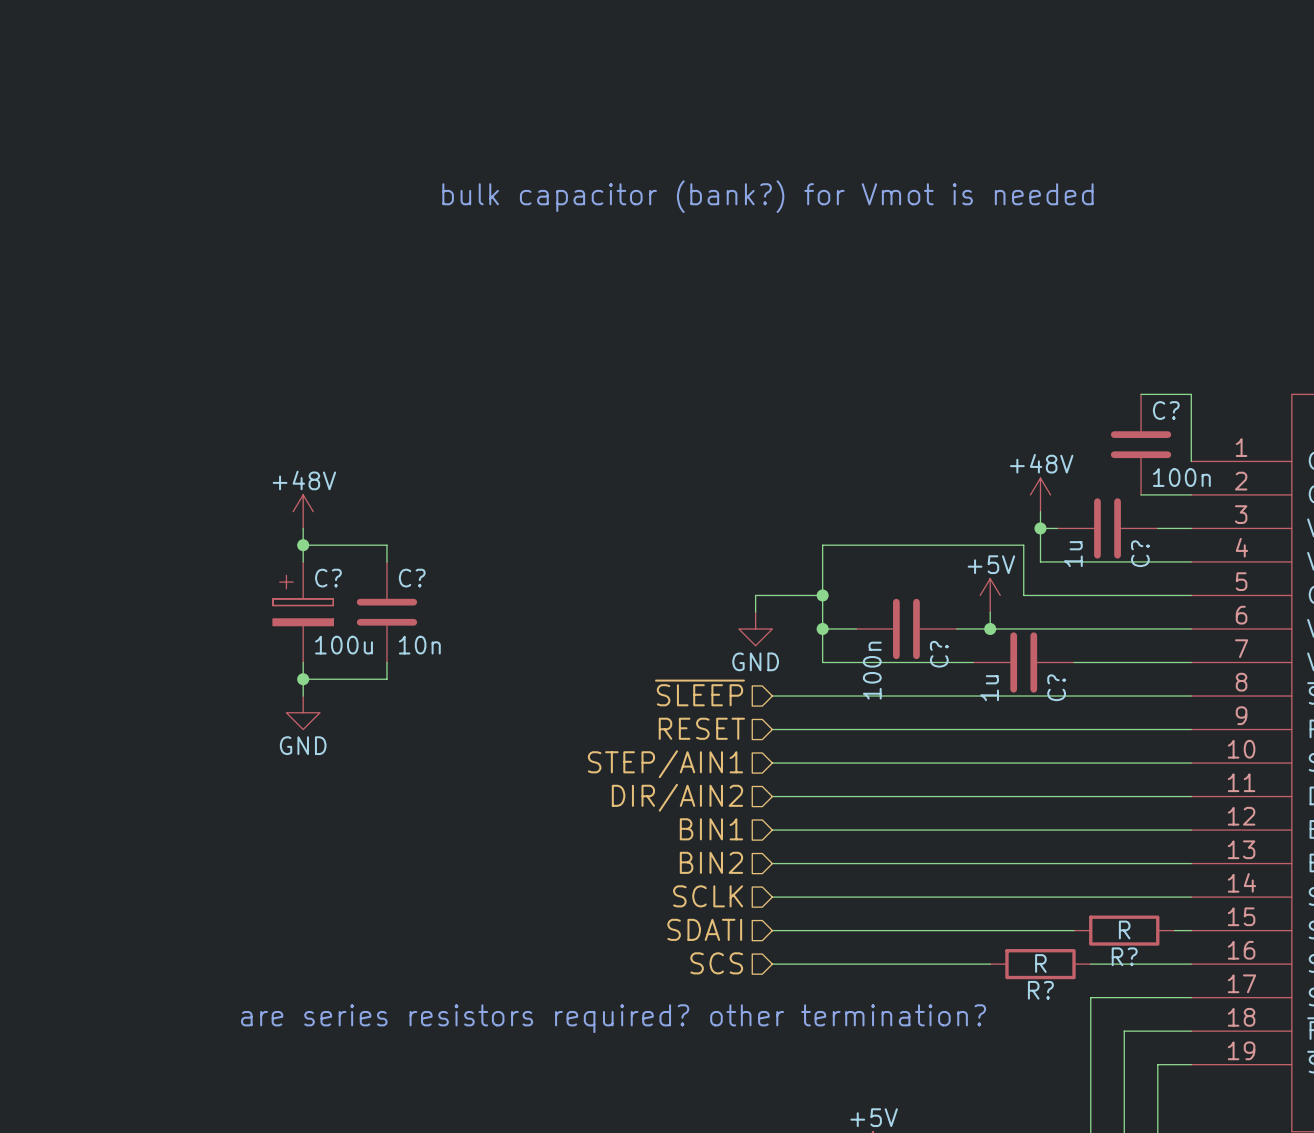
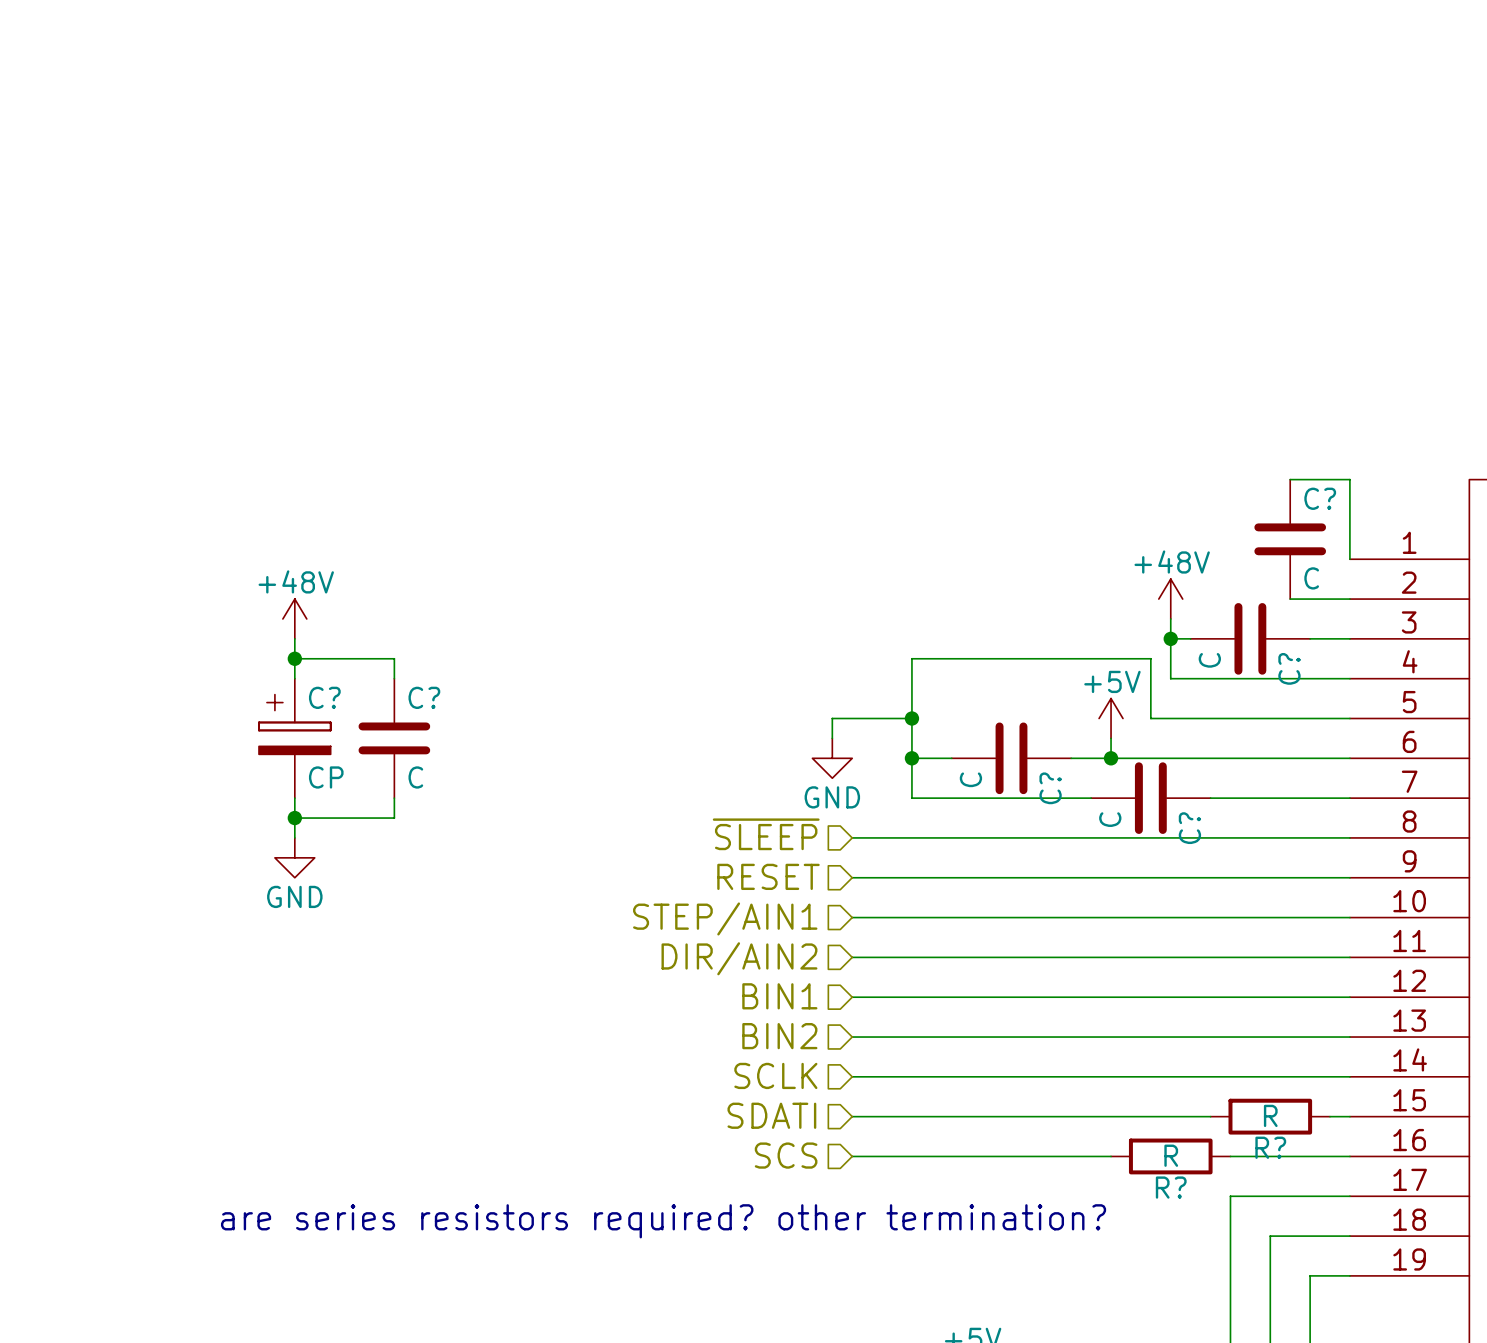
text: bulk capacitor (bank?) for Vmot is needed (767, 196) -> none
C? value: 100n (1181, 477) -> C (1311, 578)
C? value: 1u (1073, 554) -> C (1209, 660)
C? value: 100u (344, 645) -> CP (326, 777)
C? value: 10n (419, 645) -> C (415, 777)
C? value: 100n (872, 670) -> C (970, 779)
C? value: 1u (989, 688) -> C (1110, 819)

